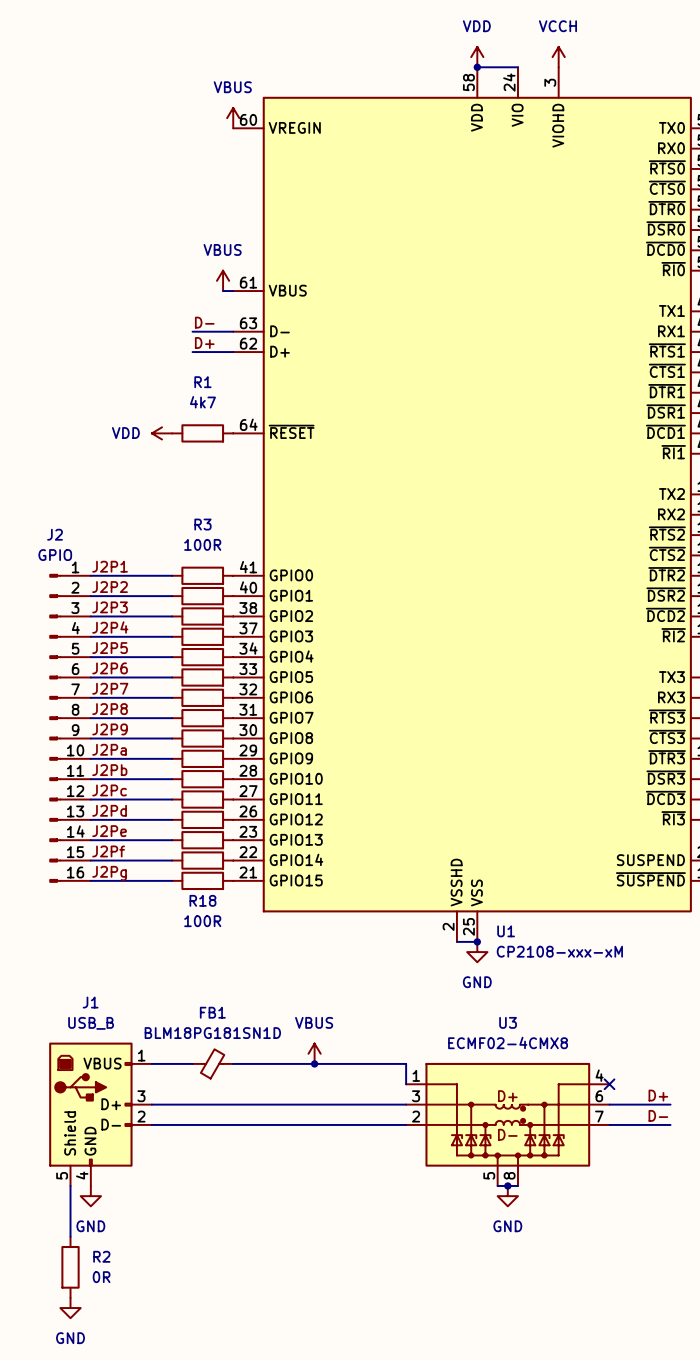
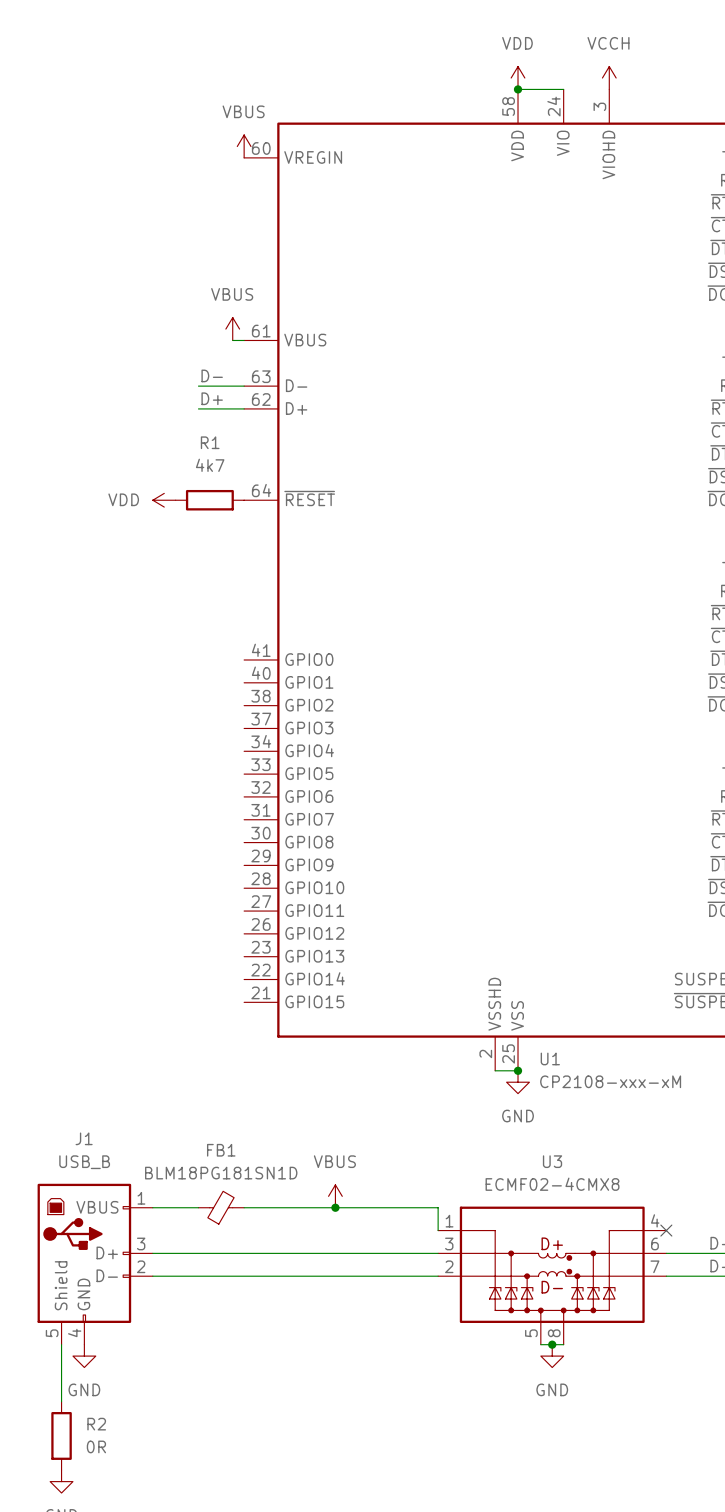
label: J2P1 (110, 566) -> none
wire: (90, 575) (172, 575) -> none
R3: 100R (202, 575) -> none
label: J2P2 (110, 587) -> none
wire: (90, 596) (172, 596) -> none
part: (202, 596) -> none
label: J2P3 (110, 607) -> none
wire: (90, 616) (172, 616) -> none
part: (202, 616) -> none
label: J2P4 (110, 627) -> none
wire: (90, 636) (172, 636) -> none
part: (202, 636) -> none
label: J2P5 (110, 648) -> none
wire: (90, 657) (172, 657) -> none
part: (202, 657) -> none
label: J2P6 (110, 668) -> none
wire: (90, 677) (172, 677) -> none
part: (202, 677) -> none
label: J2P7 (110, 688) -> none
wire: (90, 697) (172, 697) -> none
part: (202, 697) -> none
label: J2P8 (110, 709) -> none
wire: (90, 718) (172, 718) -> none
part: (202, 718) -> none
J2: GPIO (70, 728) -> none
label: J2P9 (110, 729) -> none
wire: (90, 738) (172, 738) -> none
part: (202, 738) -> none
label: J2Pa (109, 749) -> none
wire: (90, 758) (172, 758) -> none
part: (202, 758) -> none
label: J2Pb (109, 770) -> none
wire: (90, 779) (172, 779) -> none
part: (202, 779) -> none
label: J2Pc (109, 790) -> none
wire: (90, 799) (172, 799) -> none
part: (202, 799) -> none
label: J2Pd (109, 810) -> none
wire: (90, 819) (172, 819) -> none
part: (202, 819) -> none
label: J2Pe (109, 831) -> none
wire: (90, 840) (172, 840) -> none
part: (202, 840) -> none
label: J2Pf (108, 851) -> none
wire: (90, 860) (172, 860) -> none
part: (202, 860) -> none
label: J2Pg (109, 873) -> none
wire: (90, 880) (172, 880) -> none
R18: 100R (202, 880) -> none

